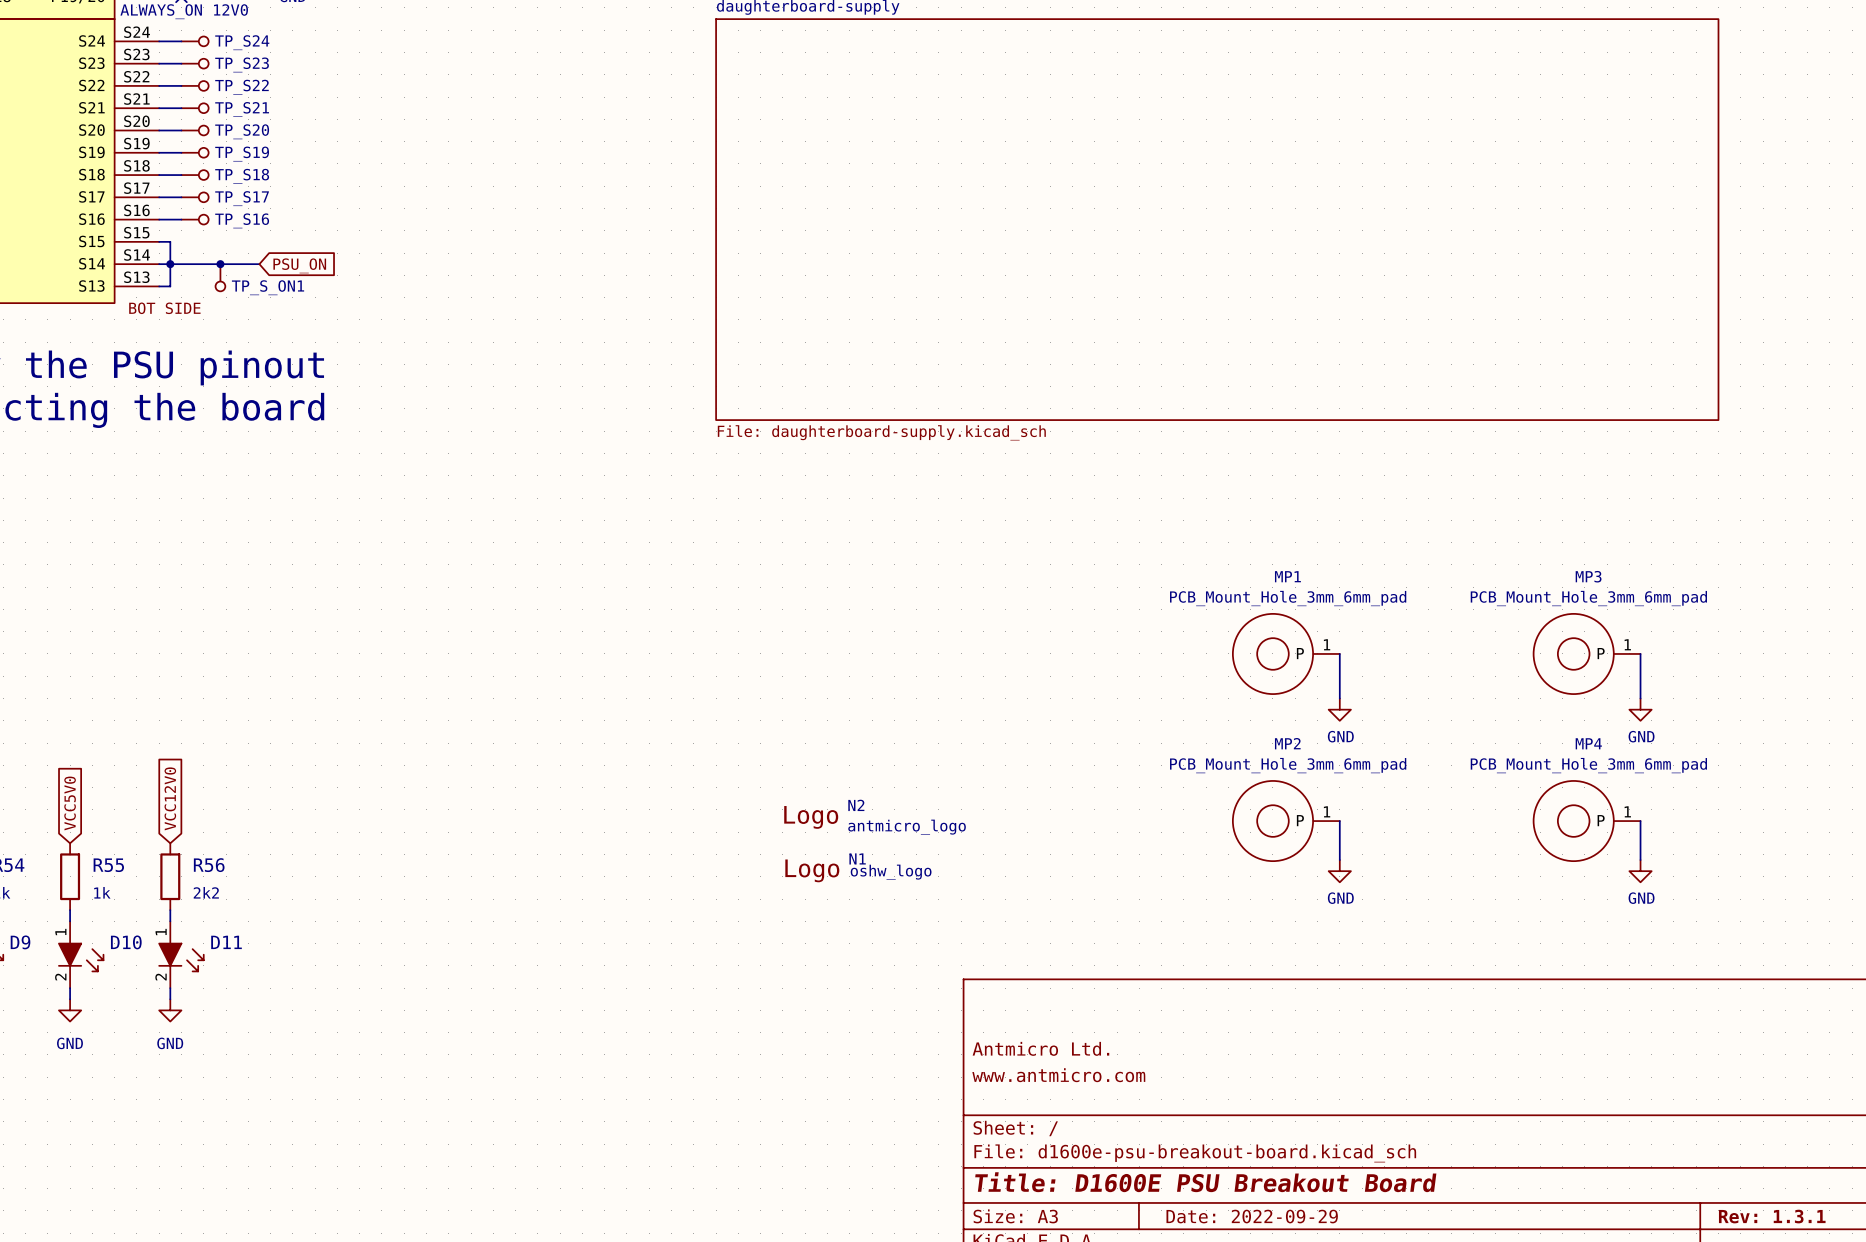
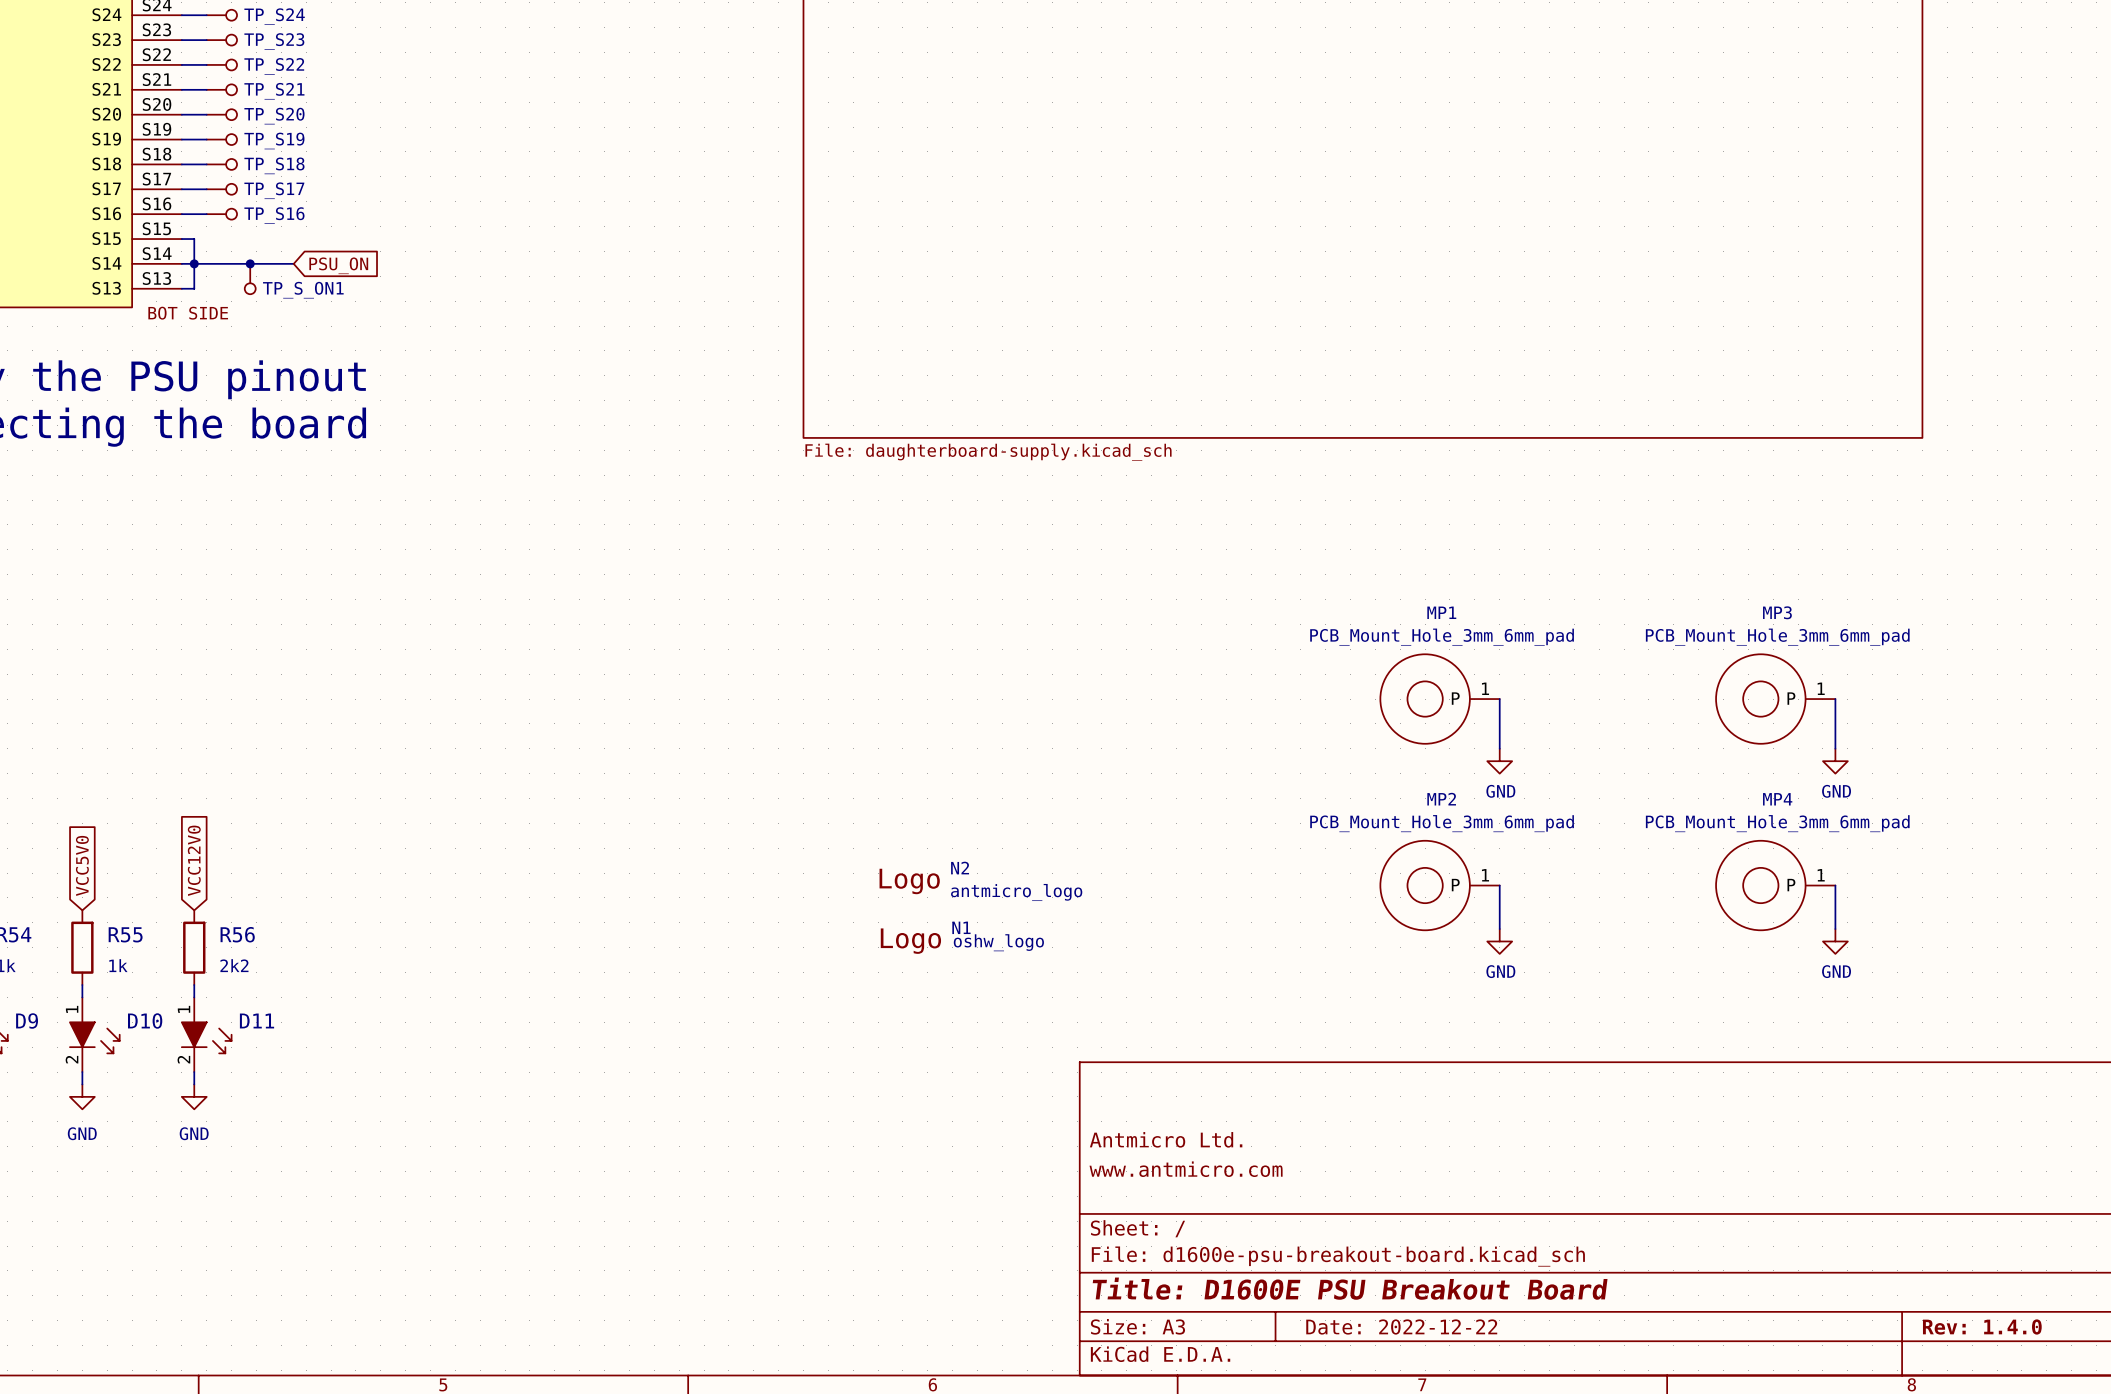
title block: Date: 2022-09-29 (1252, 1216) -> Date: 2022-12-22 (1401, 1326)
title block: Rev: 1.3.1 (1772, 1216) -> Rev: 1.4.0 (1982, 1326)

